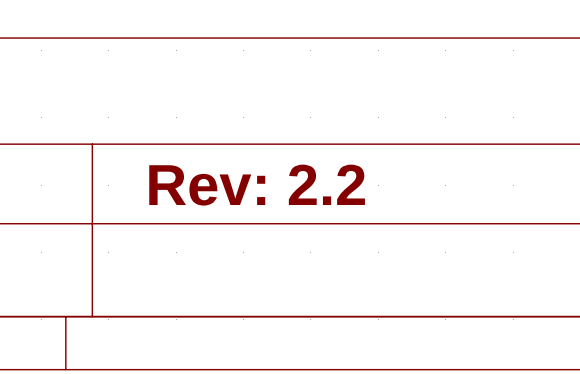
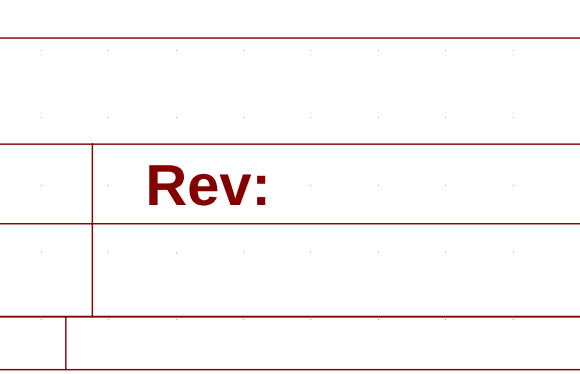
title block: Rev: 2.2 (257, 185) -> Rev: (207, 185)

